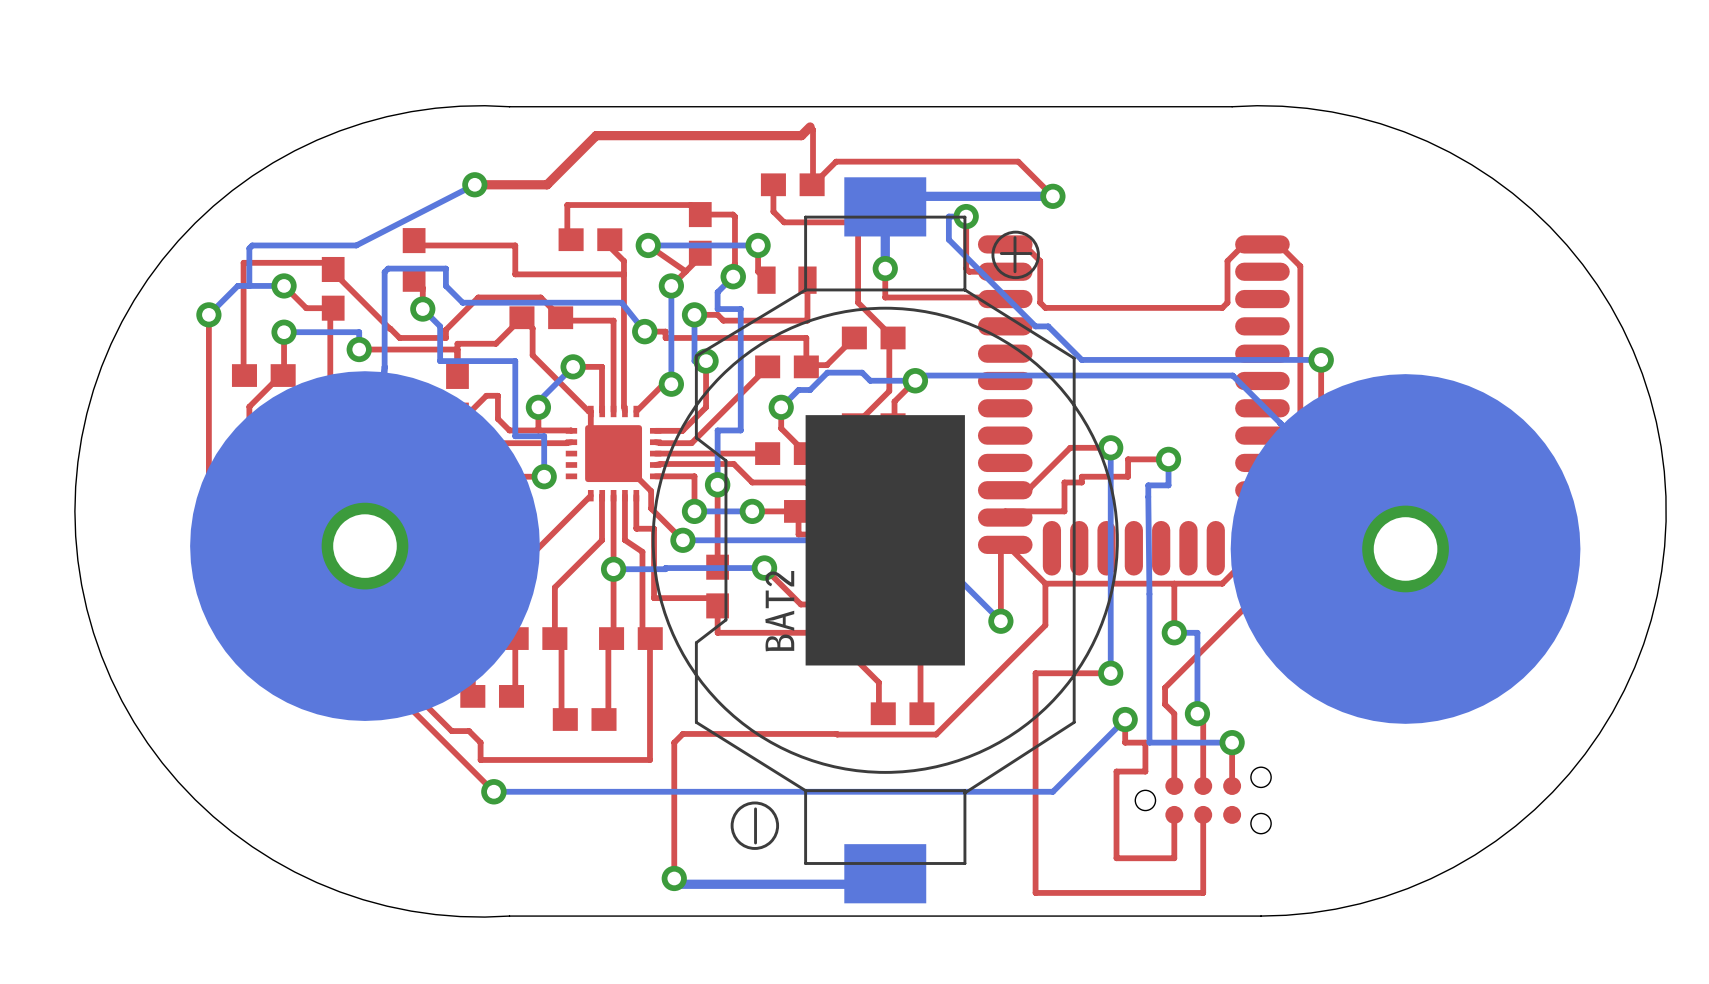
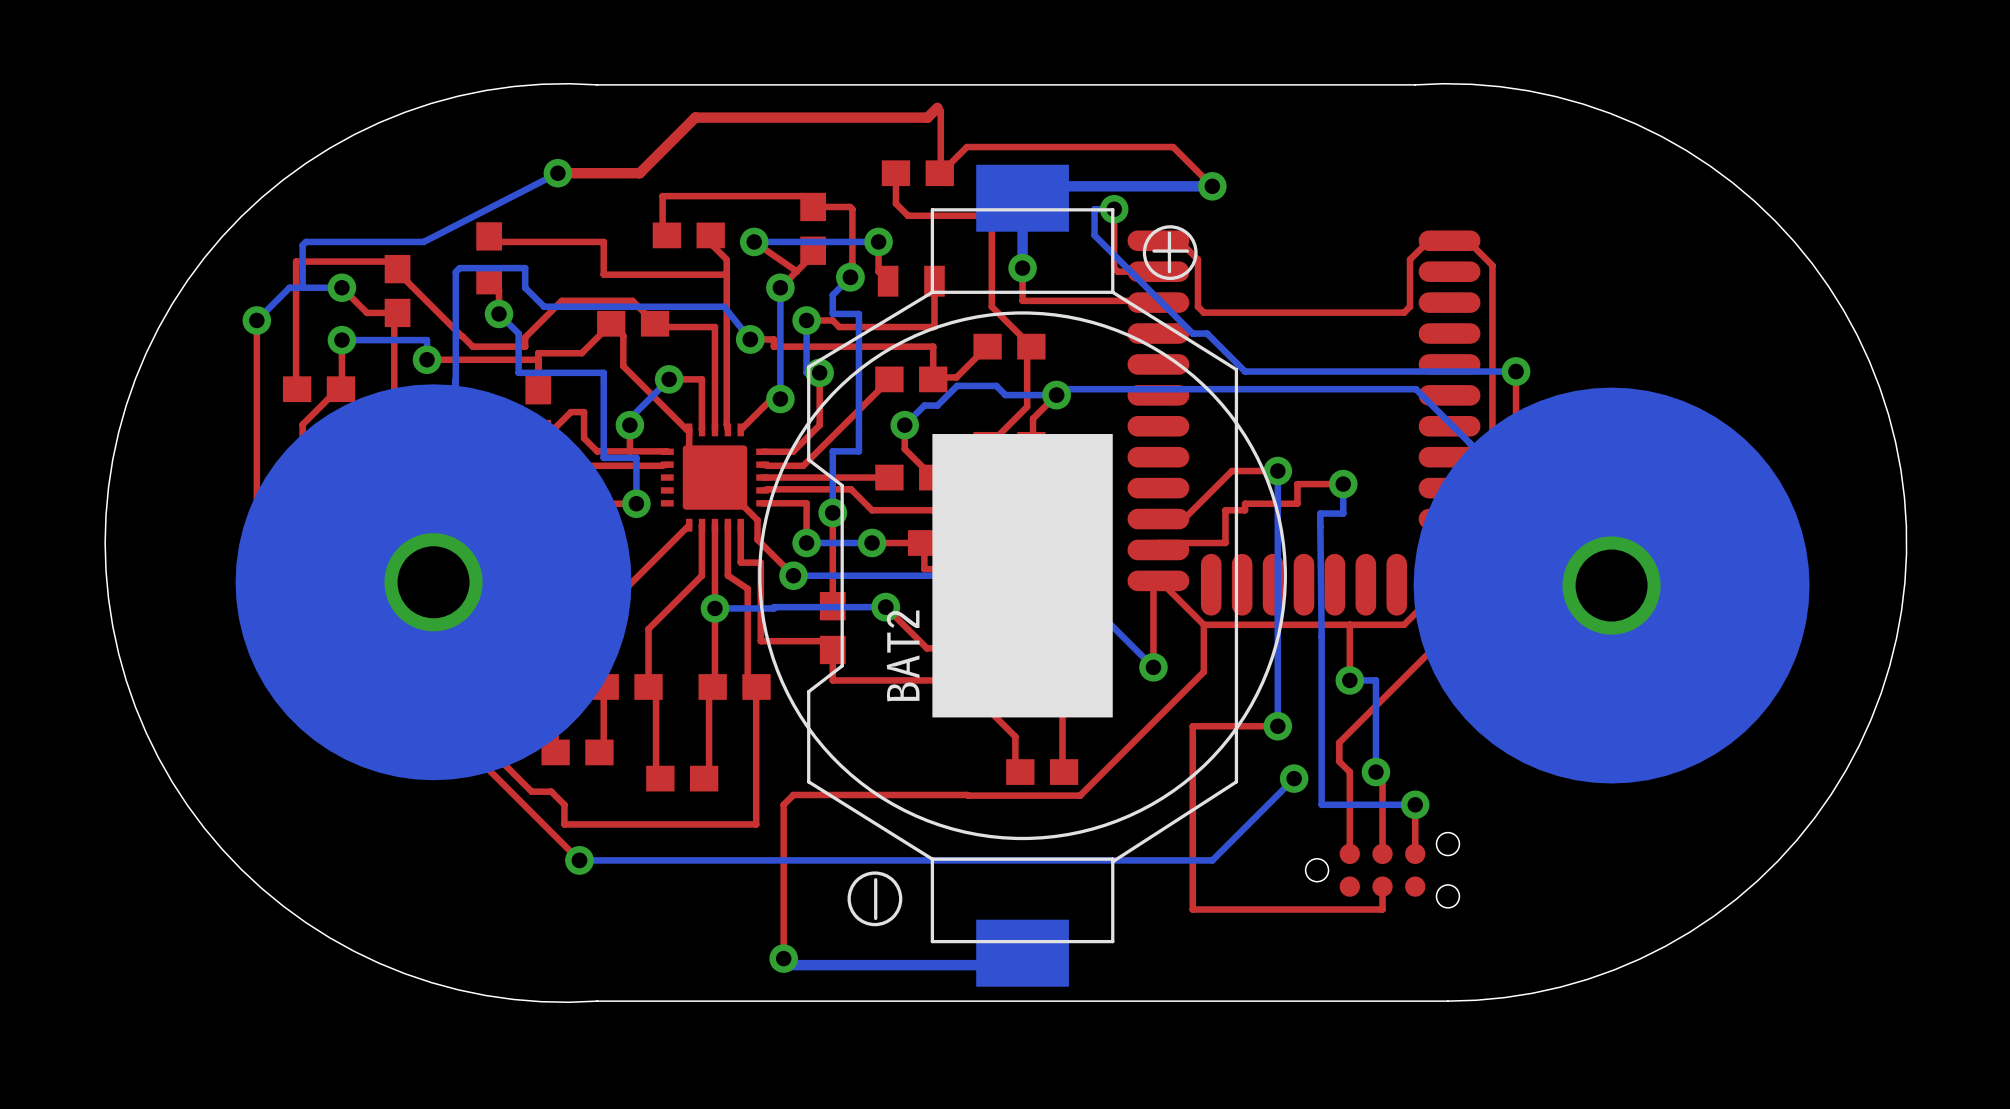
top track: (1125, 719) (1125, 742) (1145, 742) (1145, 771) (1116, 771) (1116, 858) (1174, 858) (1174, 814) -> none
top track: (1203, 835) (1203, 892) (1035, 892) (1035, 835) -> (1382, 909) (1192, 909)

